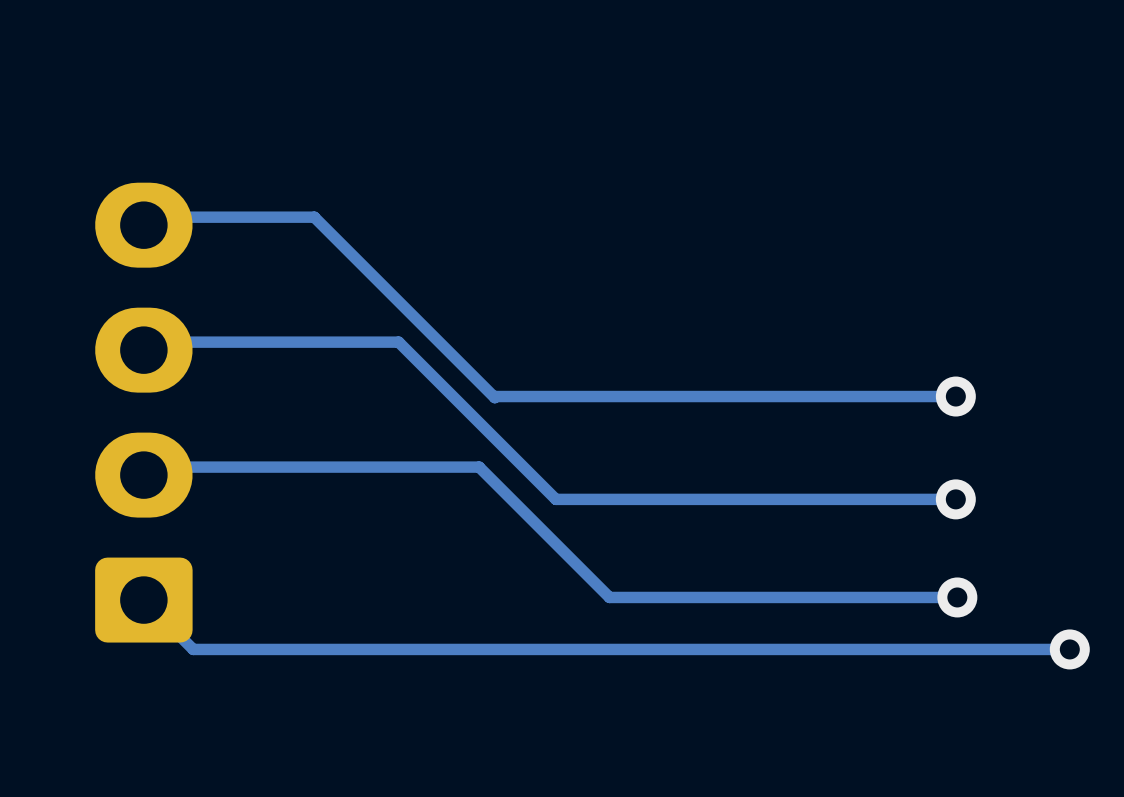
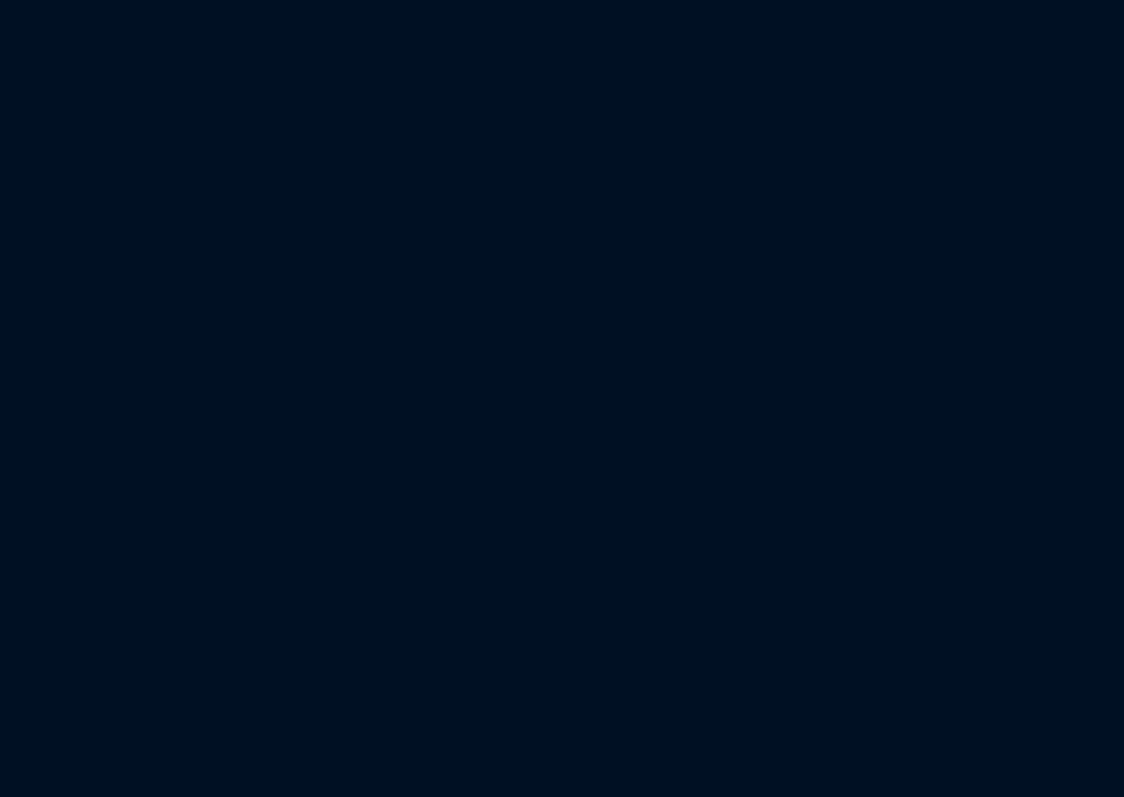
track: (148, 217) (314, 217) (494, 397) (955, 396) -> none
track: (146, 344) (148, 342) (398, 342) (555, 499) (955, 499) -> none
via: (955, 396) -> none
part: (143, 412) -> none
track: (139, 479) (151, 467) (479, 467) (609, 597) (957, 597) -> none
via: (955, 499) -> none
via: (957, 597) -> none
track: (143, 600) (193, 649) (1069, 649) -> none
via: (1069, 649) -> none

